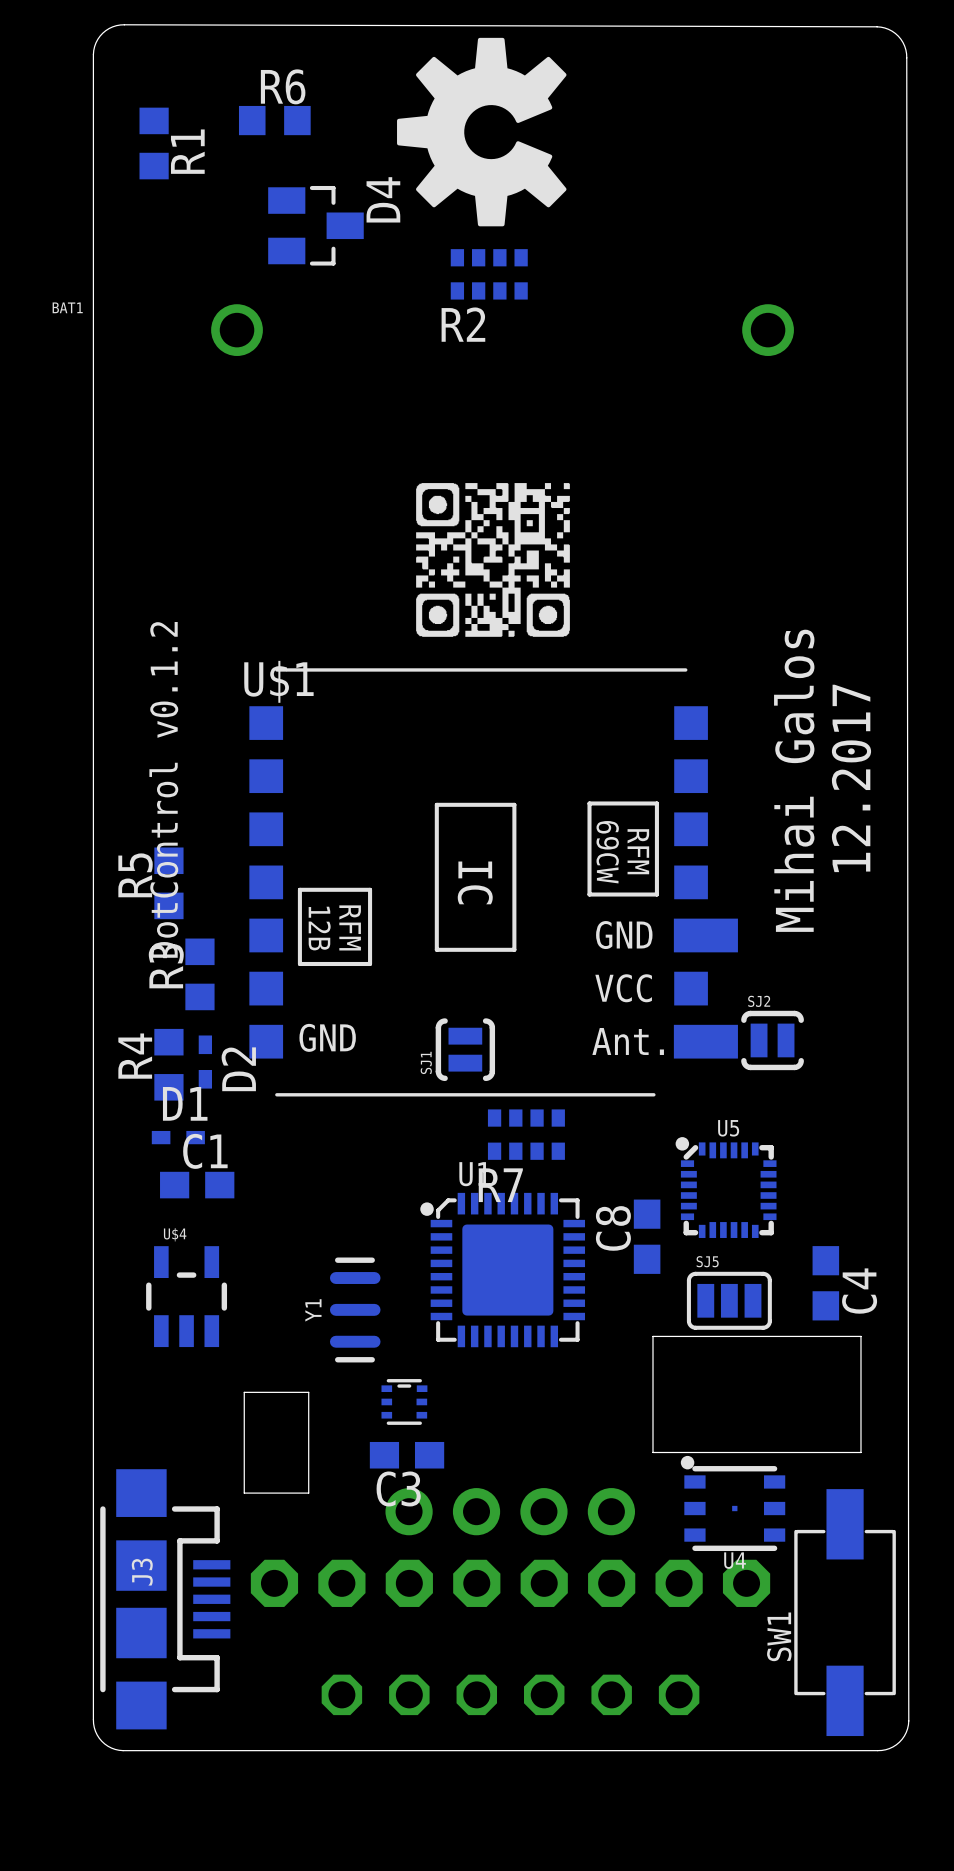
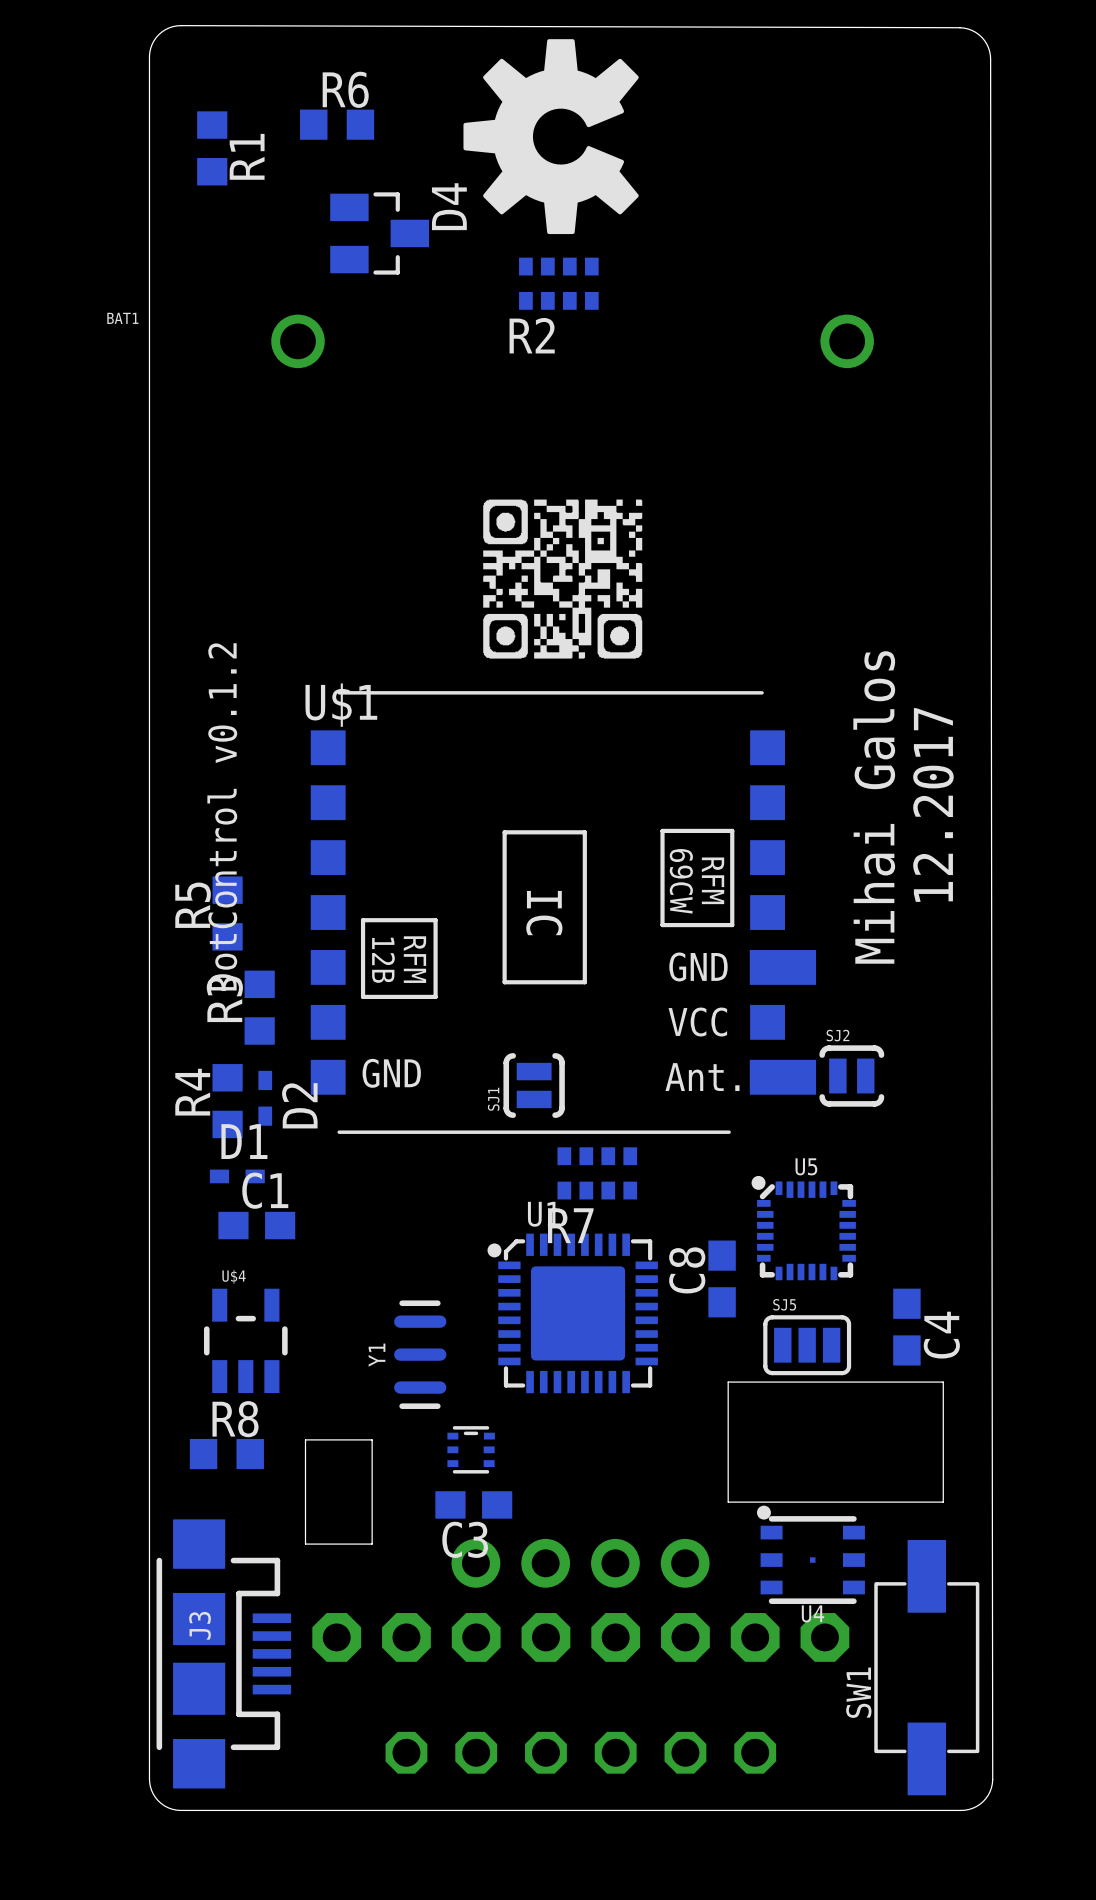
R8: none -> (226, 1454)

